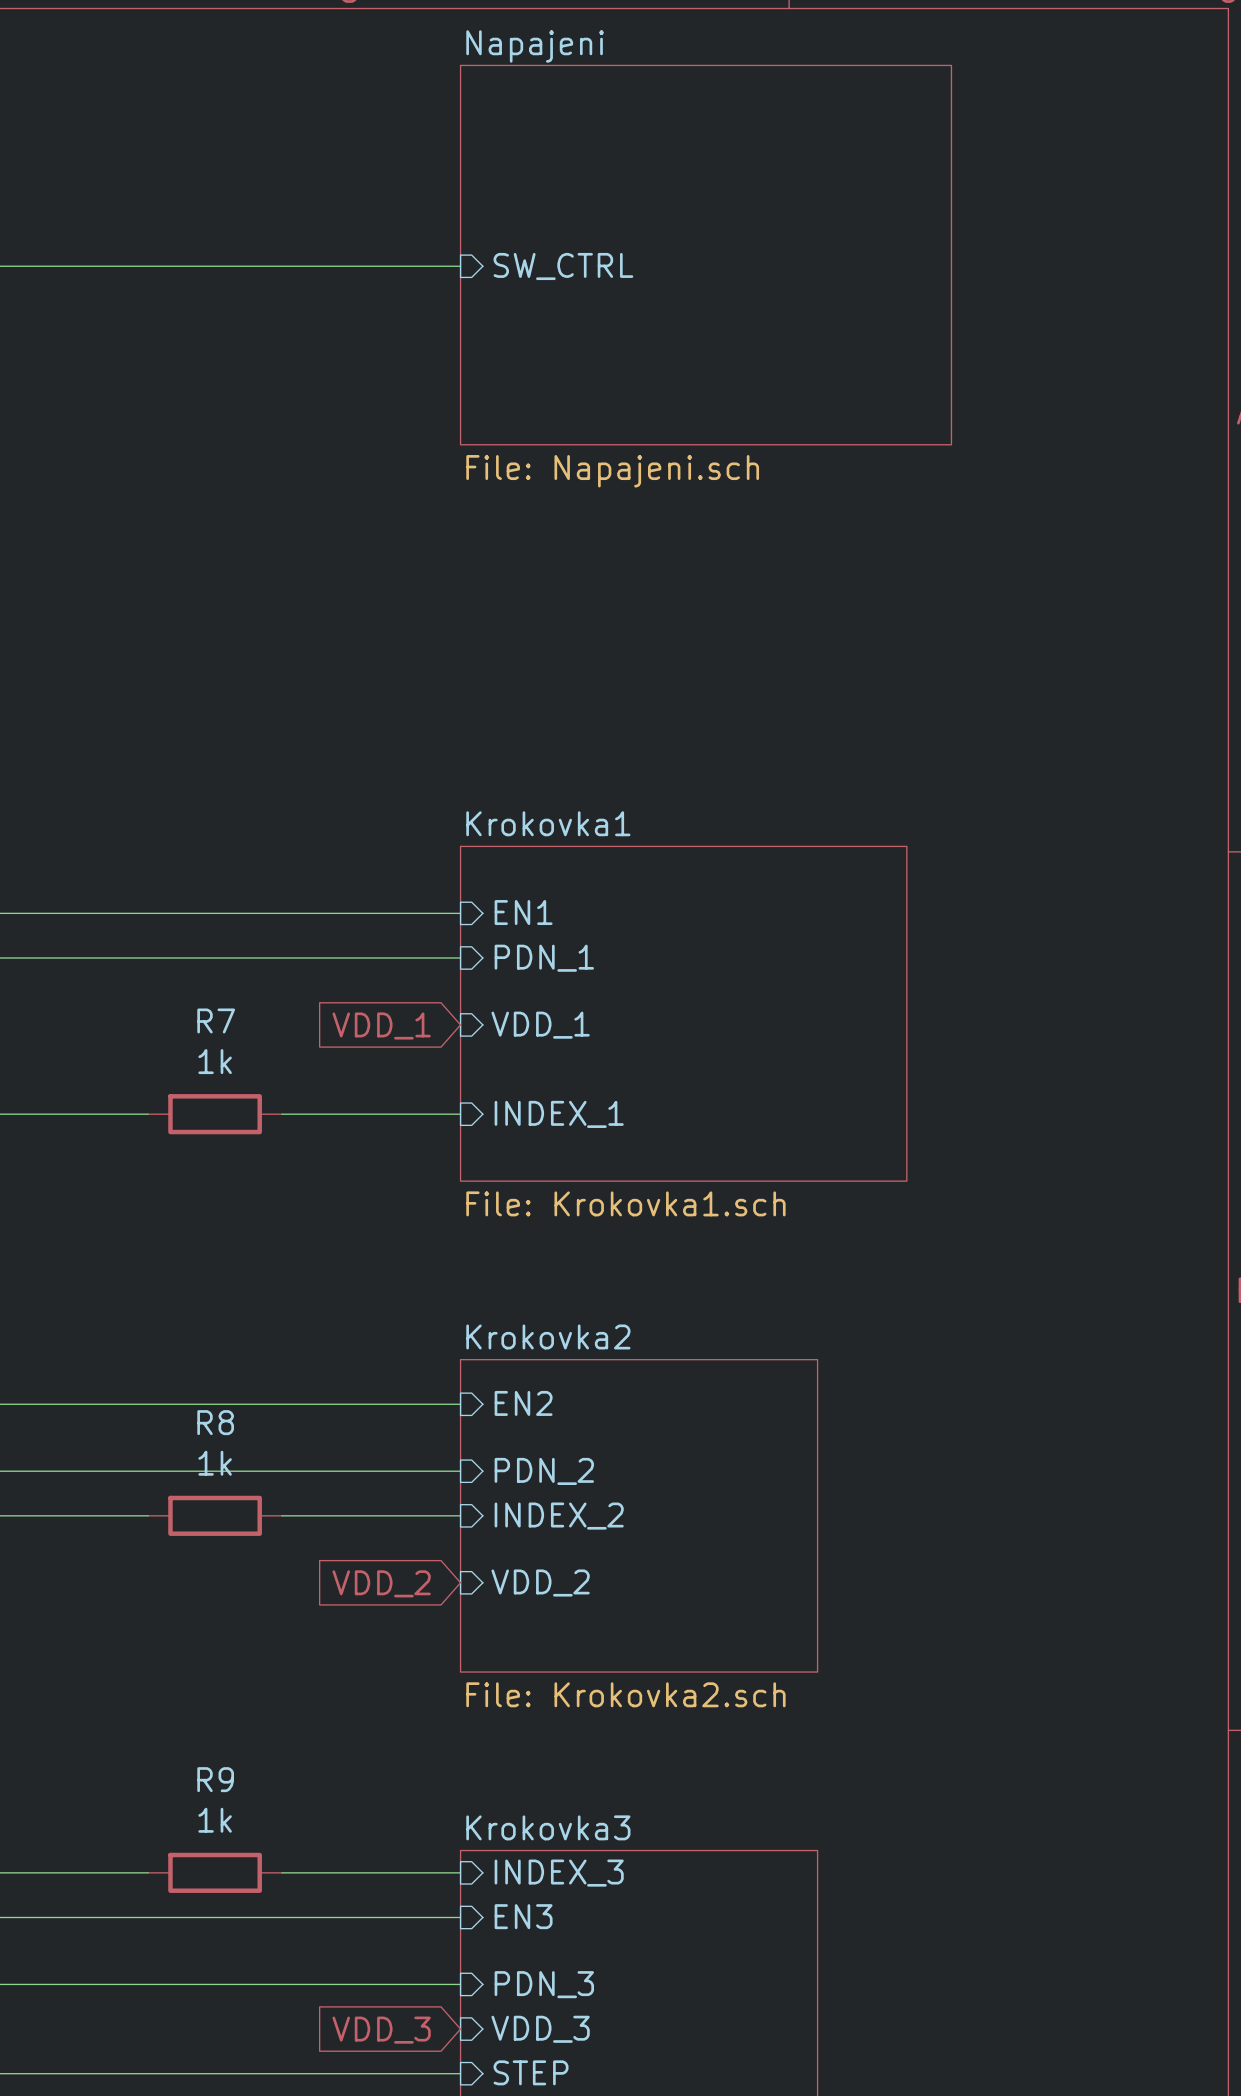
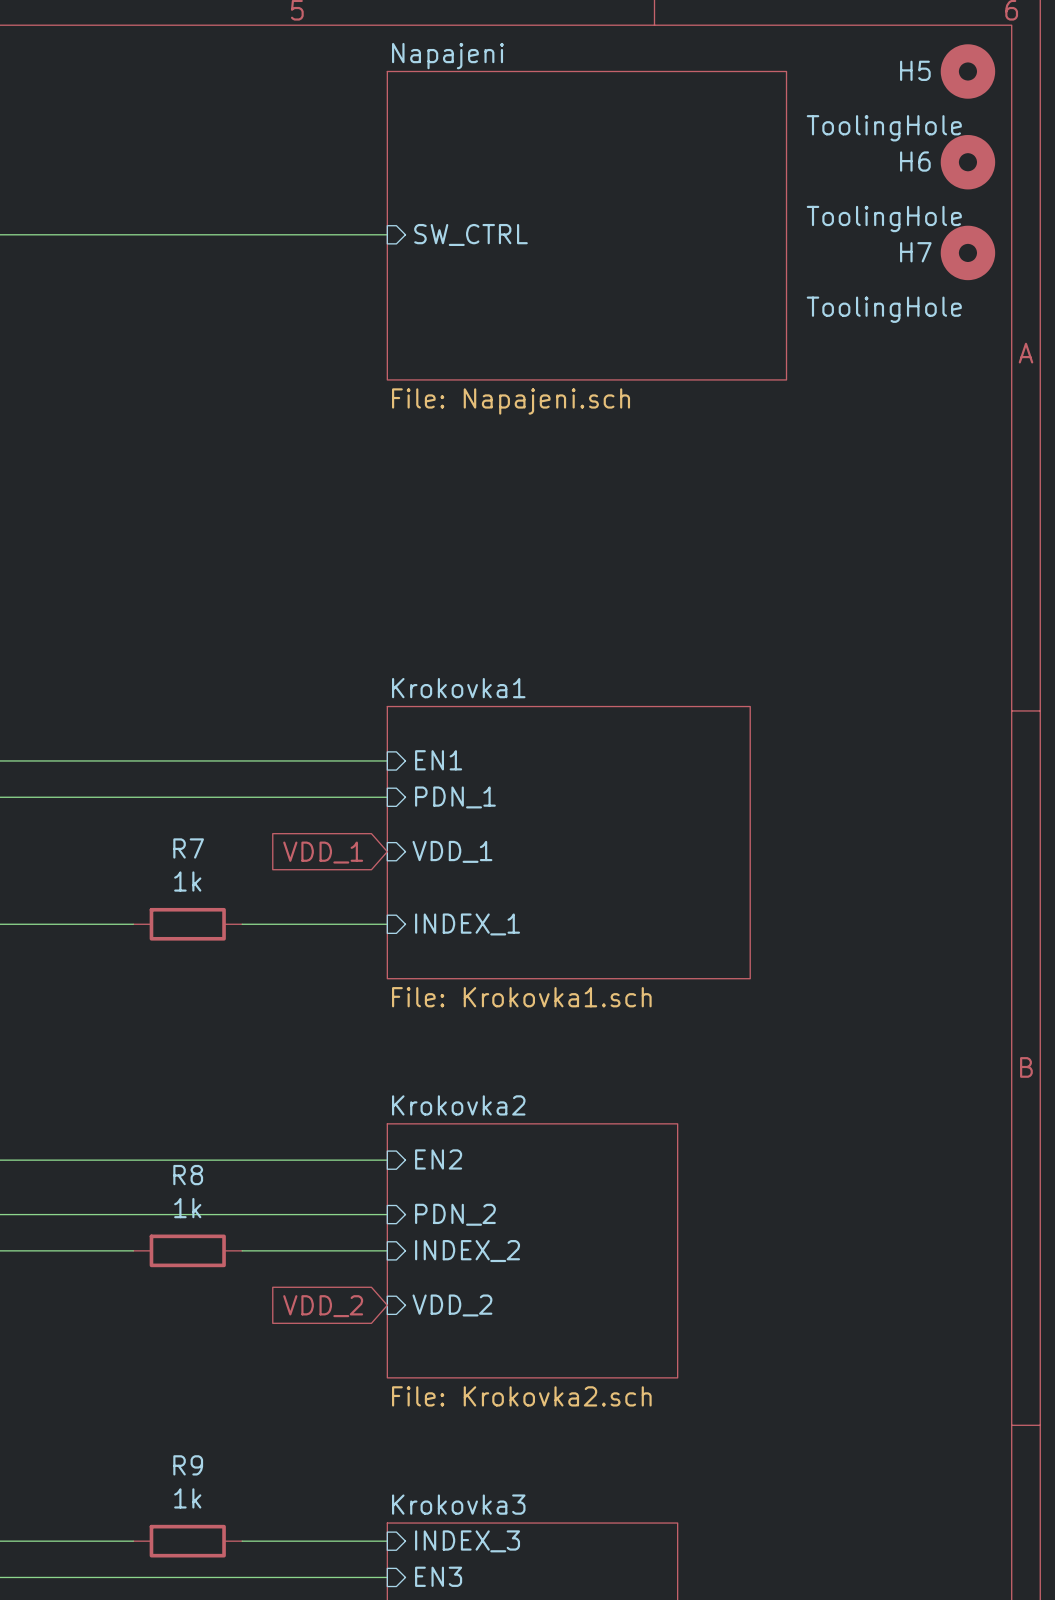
H5: none -> ToolingHole (967, 71)
H6: none -> ToolingHole (967, 162)
H7: none -> ToolingHole (967, 252)

